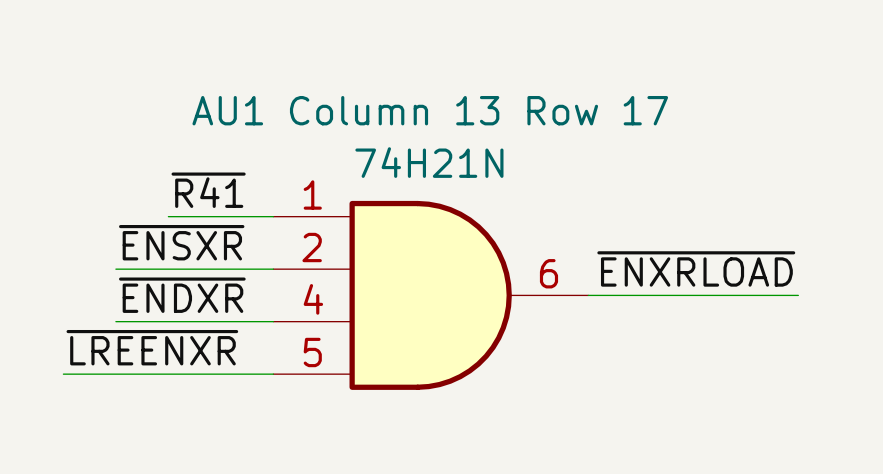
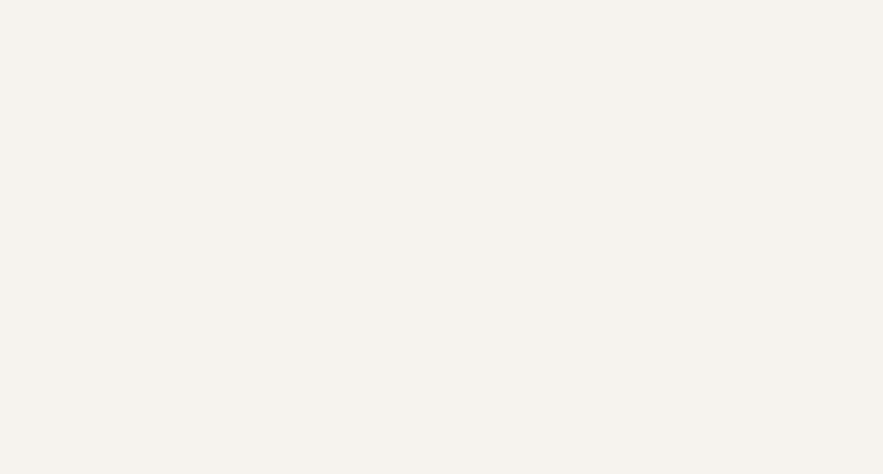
label: ~{R41} (208, 190) -> none
wire: (168, 216) (273, 216) -> none
label: ~{ENSXR} (181, 242) -> none
label: ~{ENXRLOAD} (696, 268) -> none
wire: (115, 269) (273, 269) -> none
label: ~{ENDXR} (182, 295) -> none
part: 74H21N (430, 295) -> none
wire: (588, 295) (798, 295) -> none
wire: (115, 321) (273, 321) -> none
label: ~{LREENXR} (152, 347) -> none
wire: (63, 374) (273, 374) -> none

